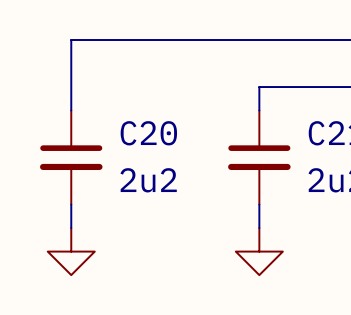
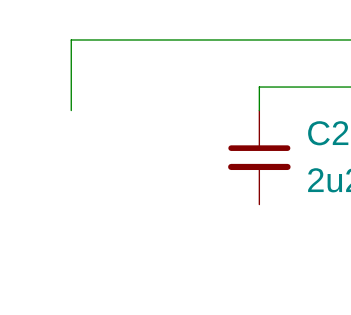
C20: 2u2 (71, 157) -> none
wire: (71, 204) (71, 228) -> none
wire: (259, 204) (259, 228) -> none
power symbol: (71, 251) -> none
power symbol: (259, 251) -> none

